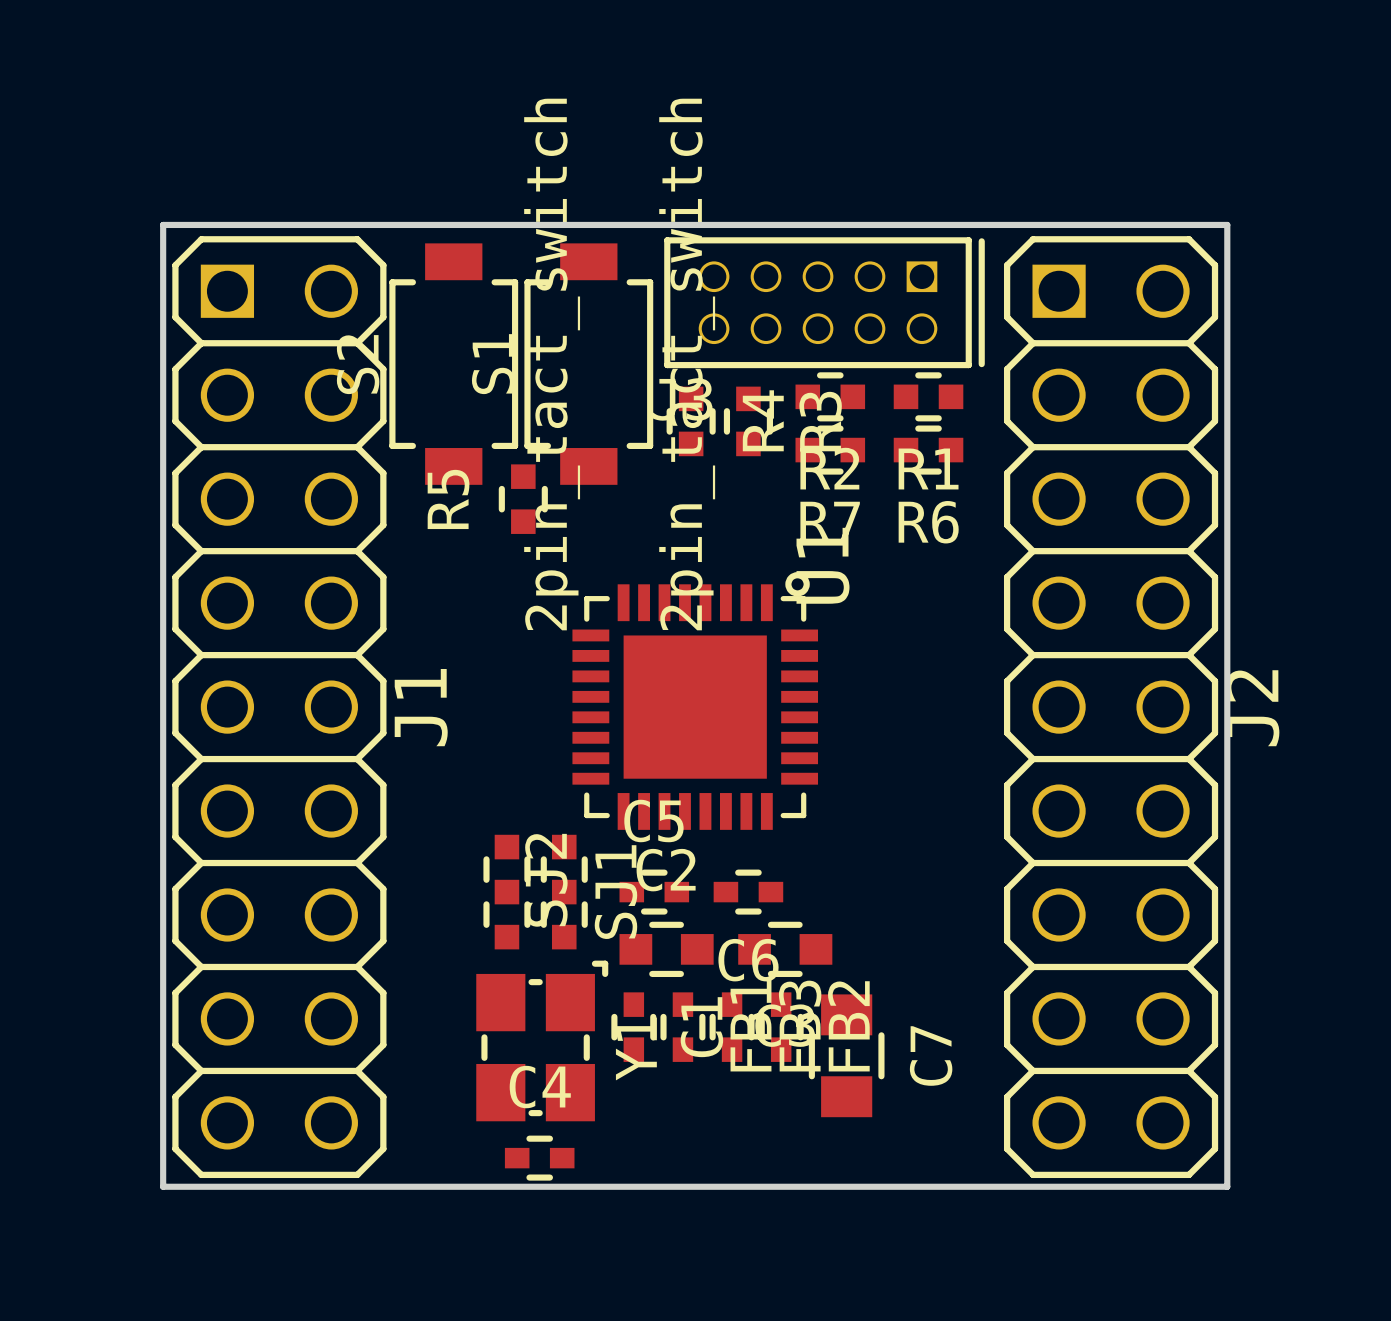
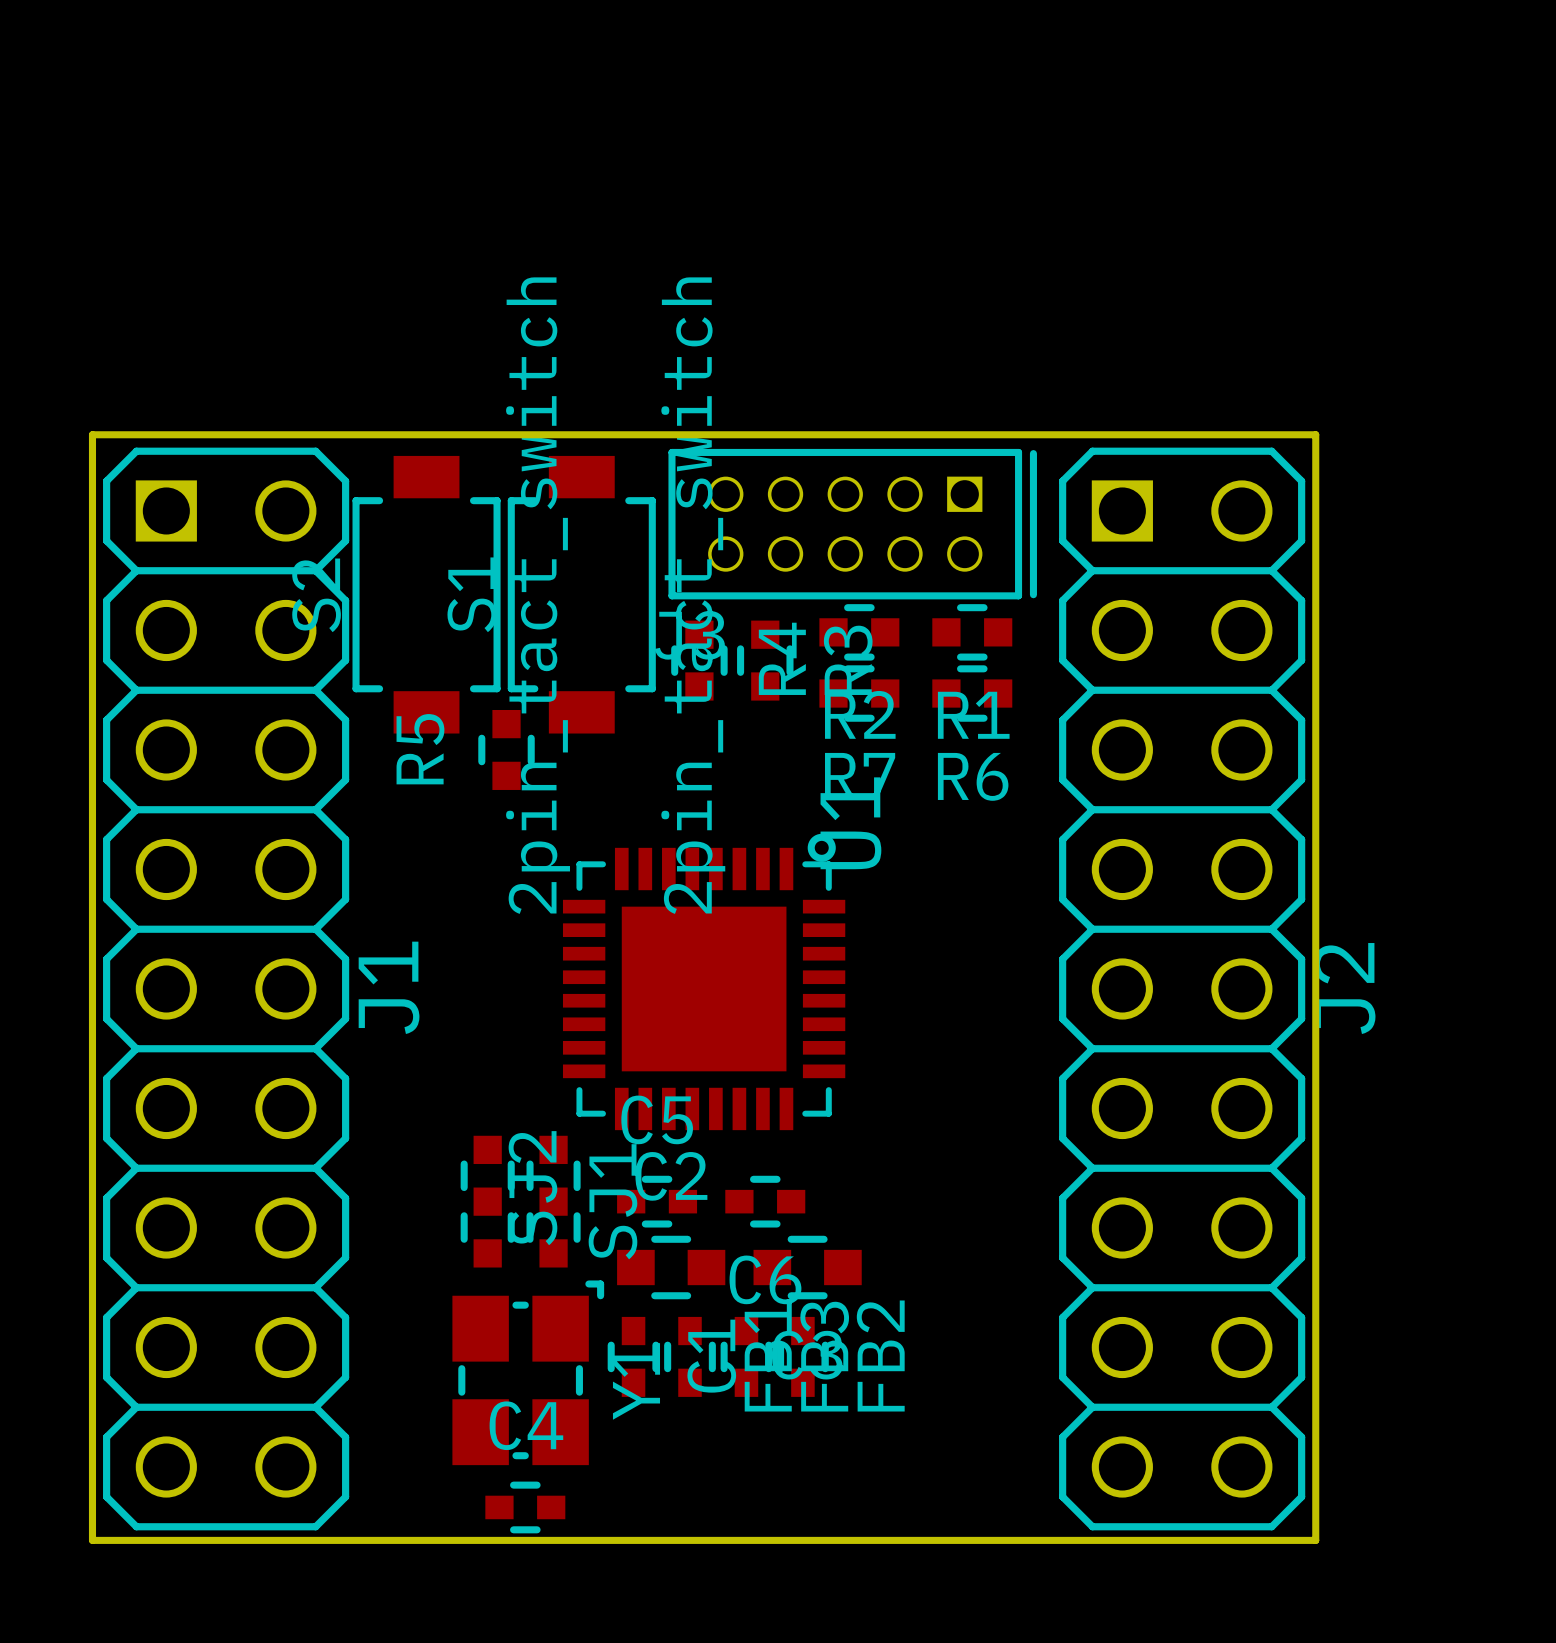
C7: (846, 1055) -> none

